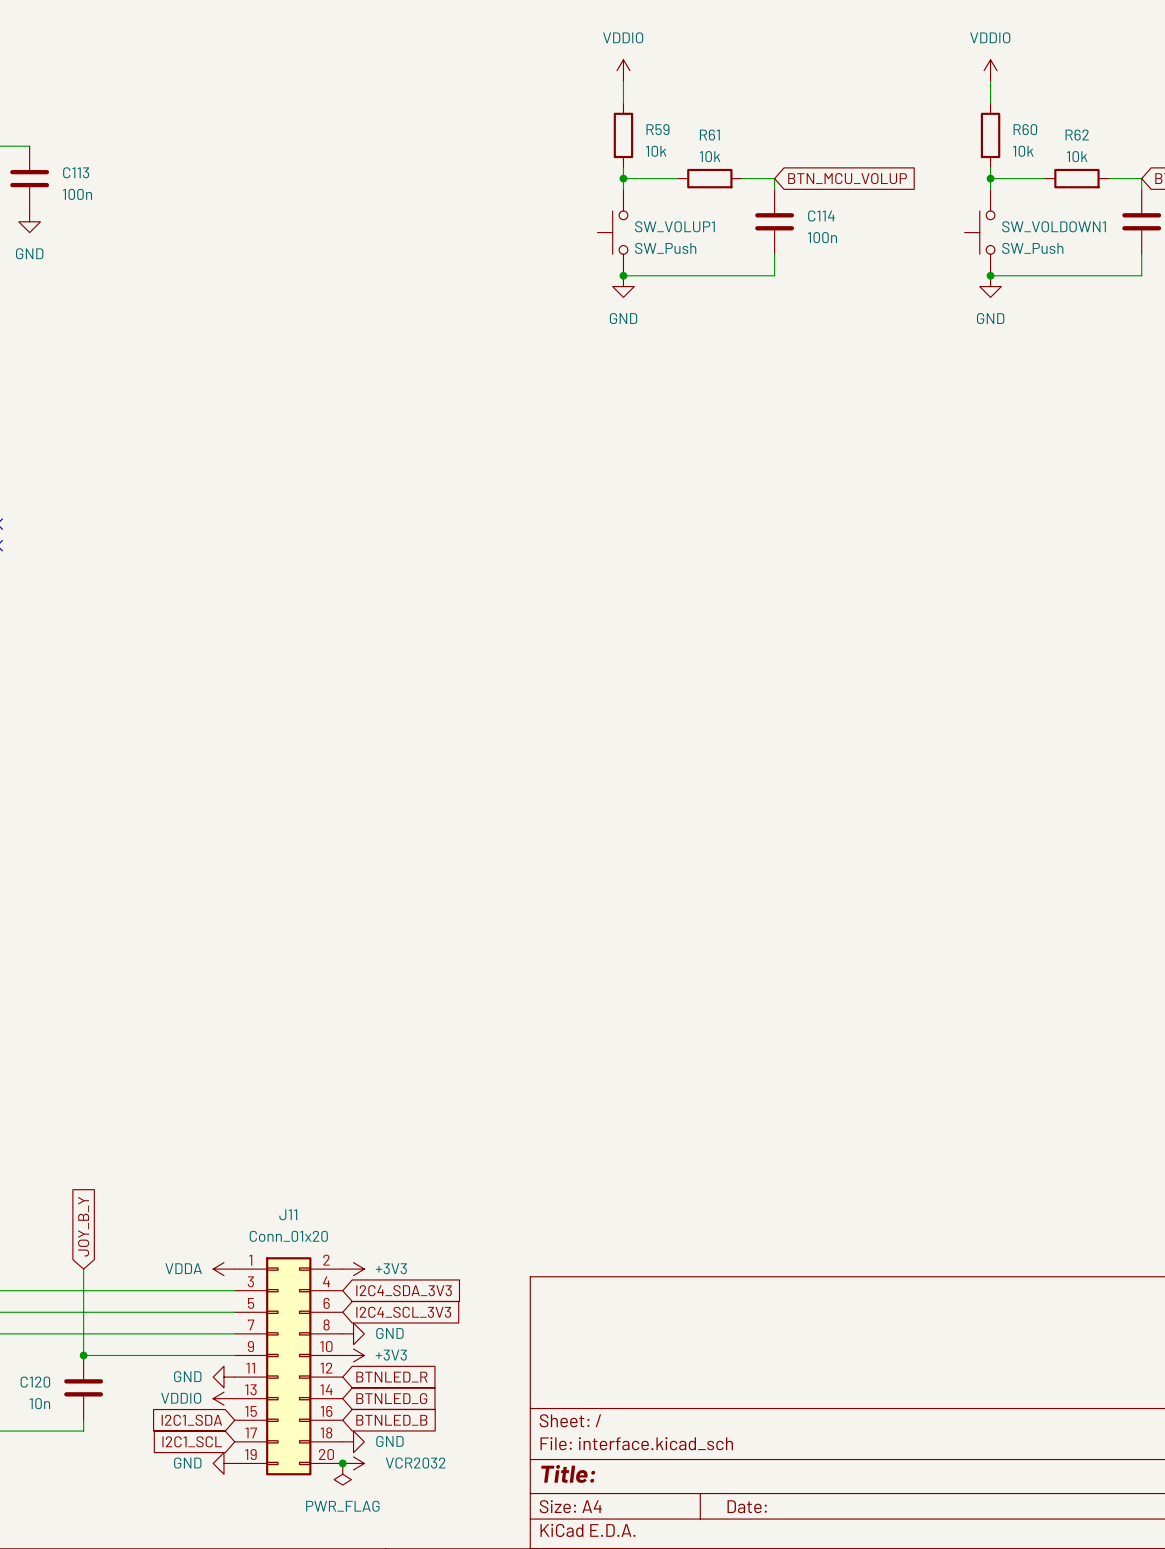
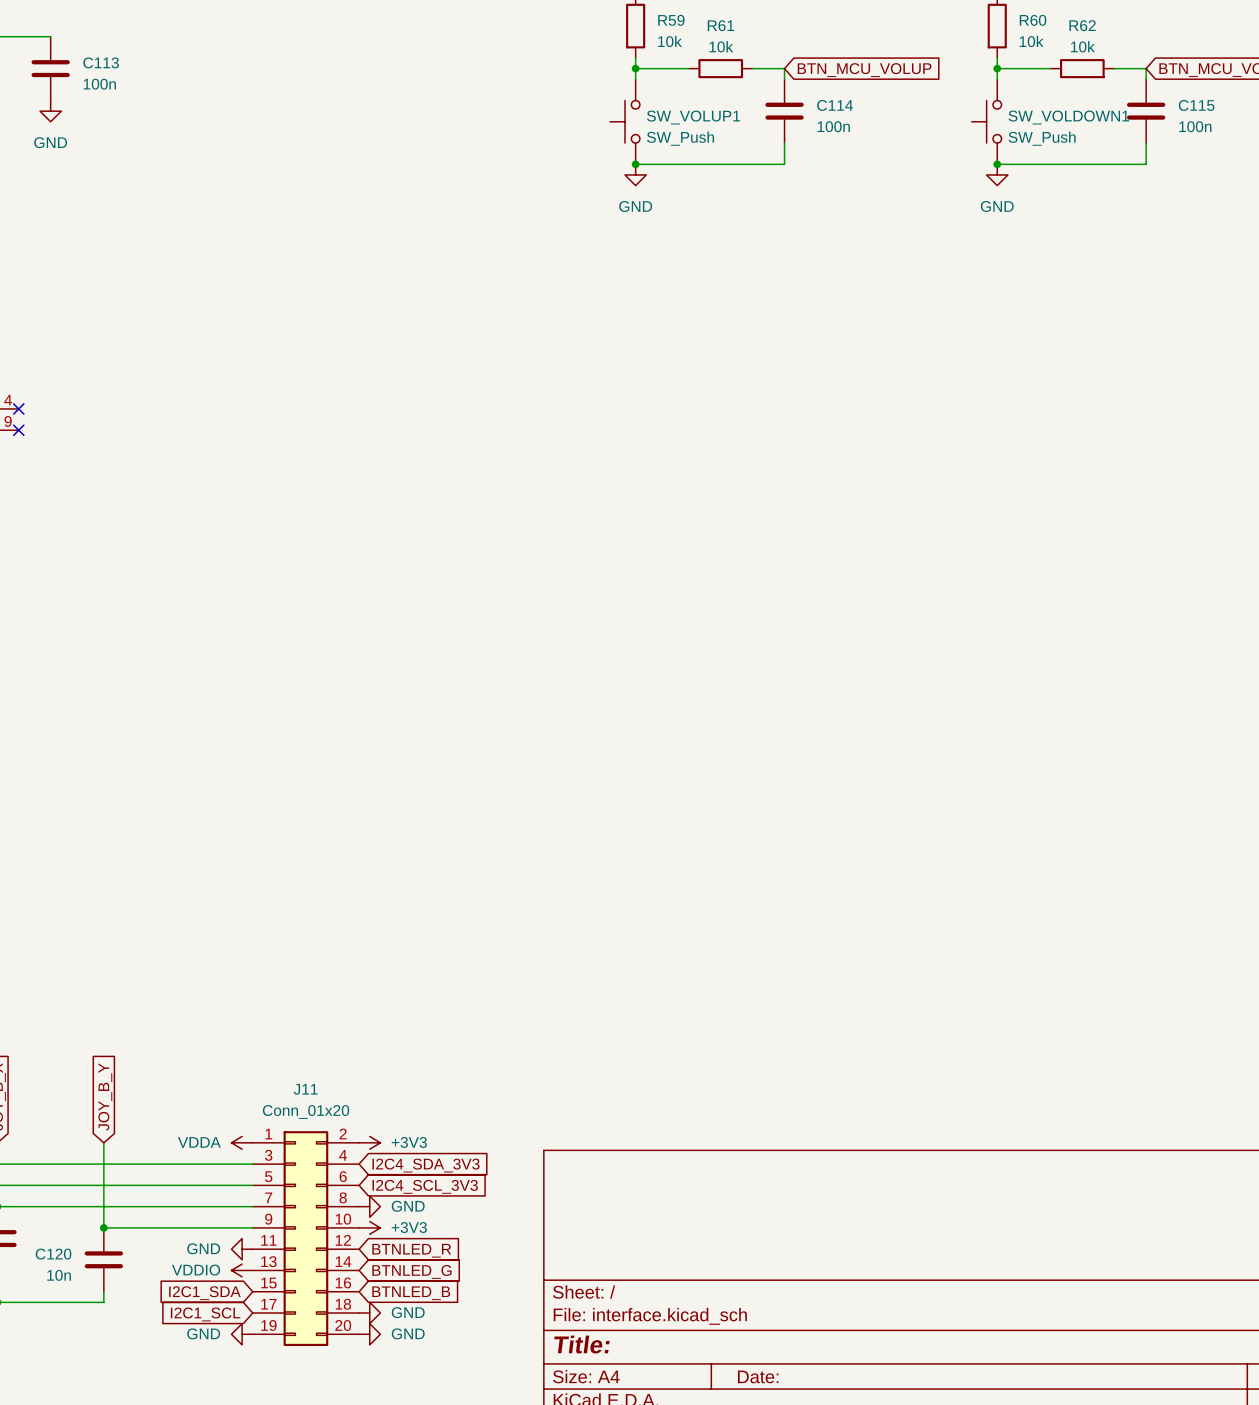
junction: (342, 1463) -> none
power symbol: VCR2032 (353, 1463) -> GND (369, 1334)
power symbol: PWR_FLAG (342, 1474) -> none

